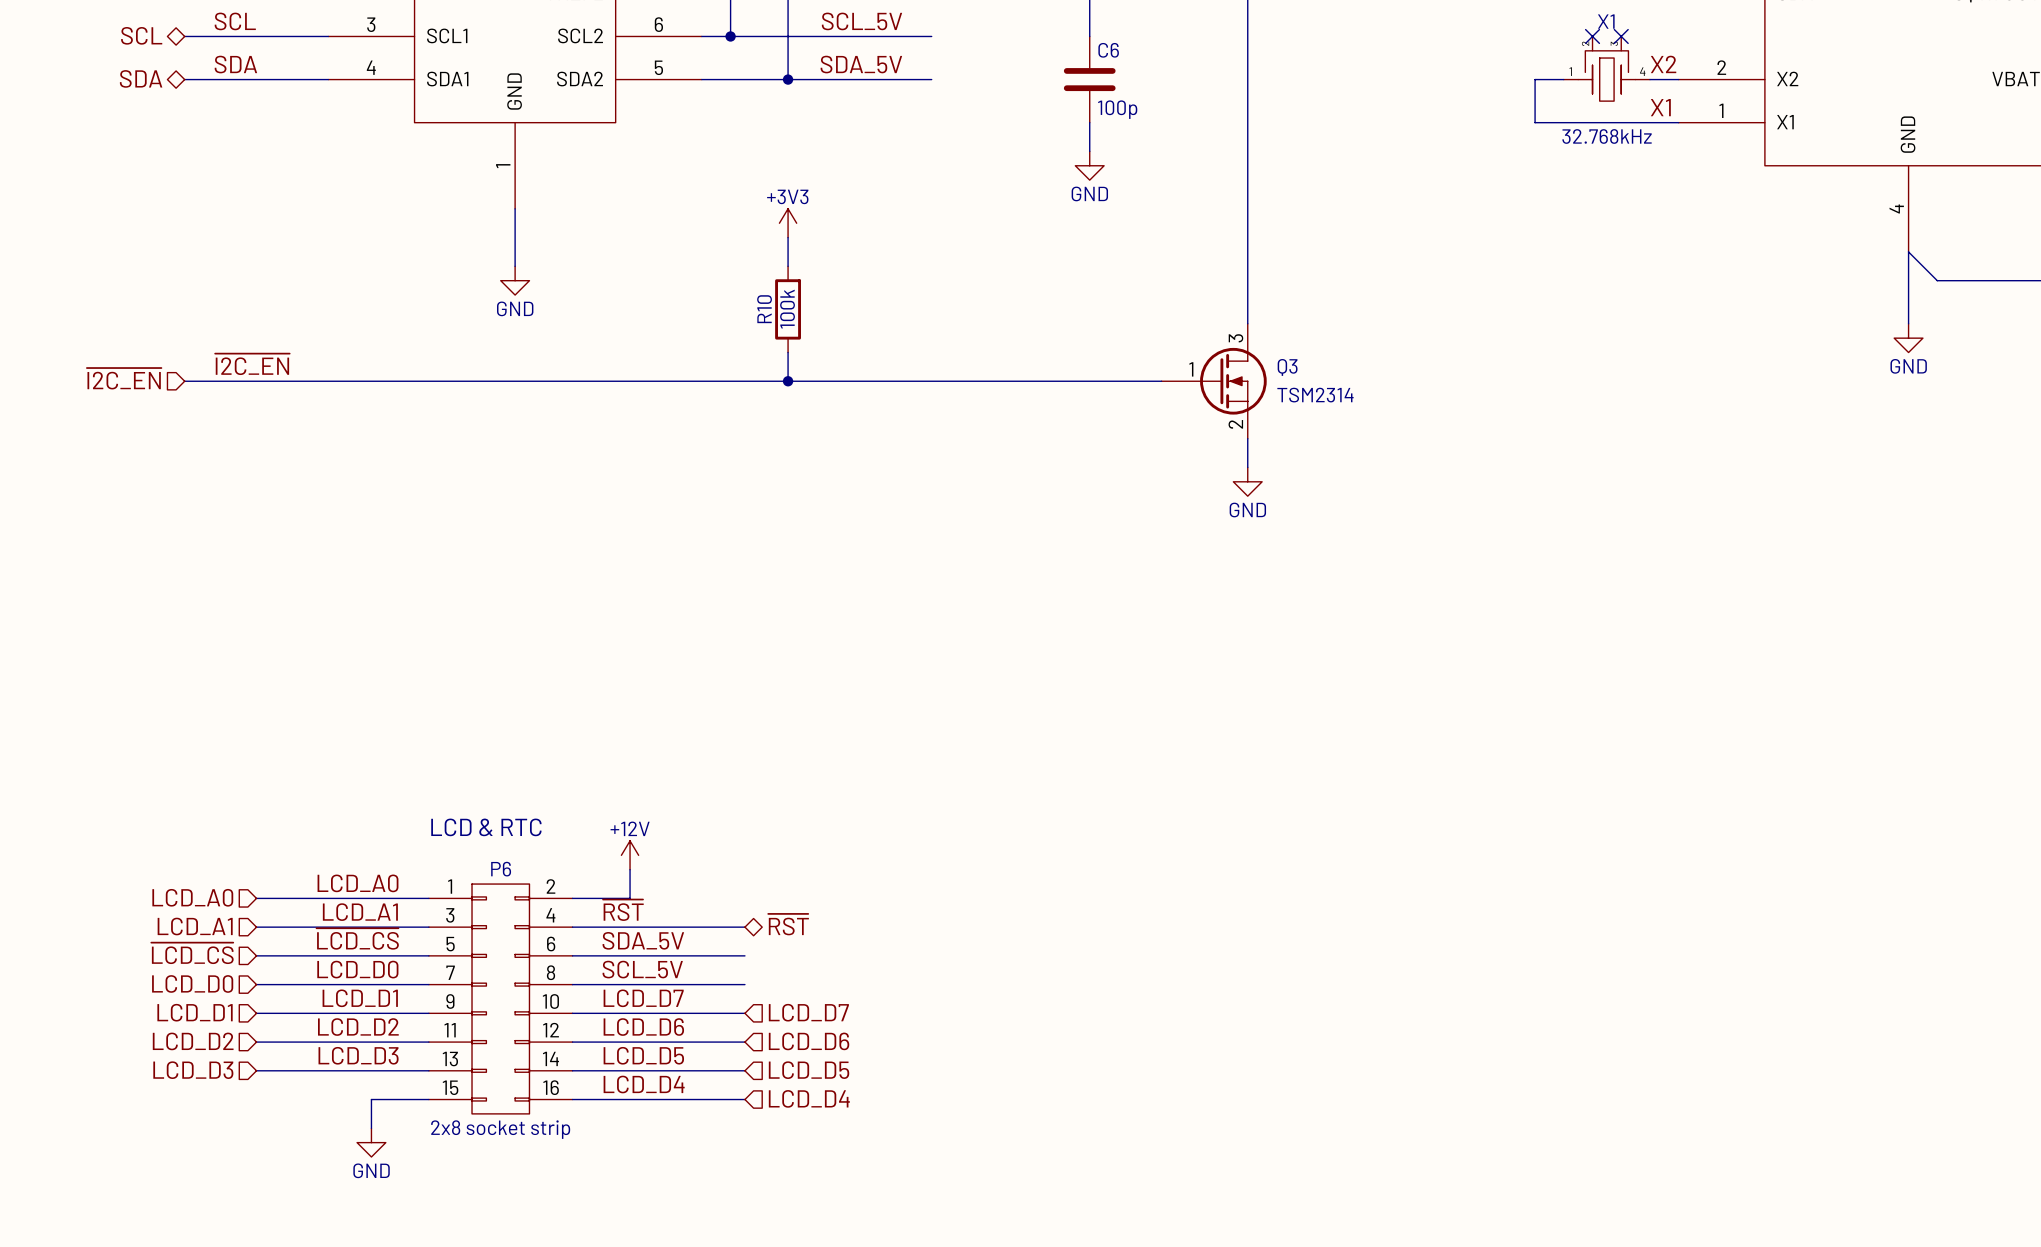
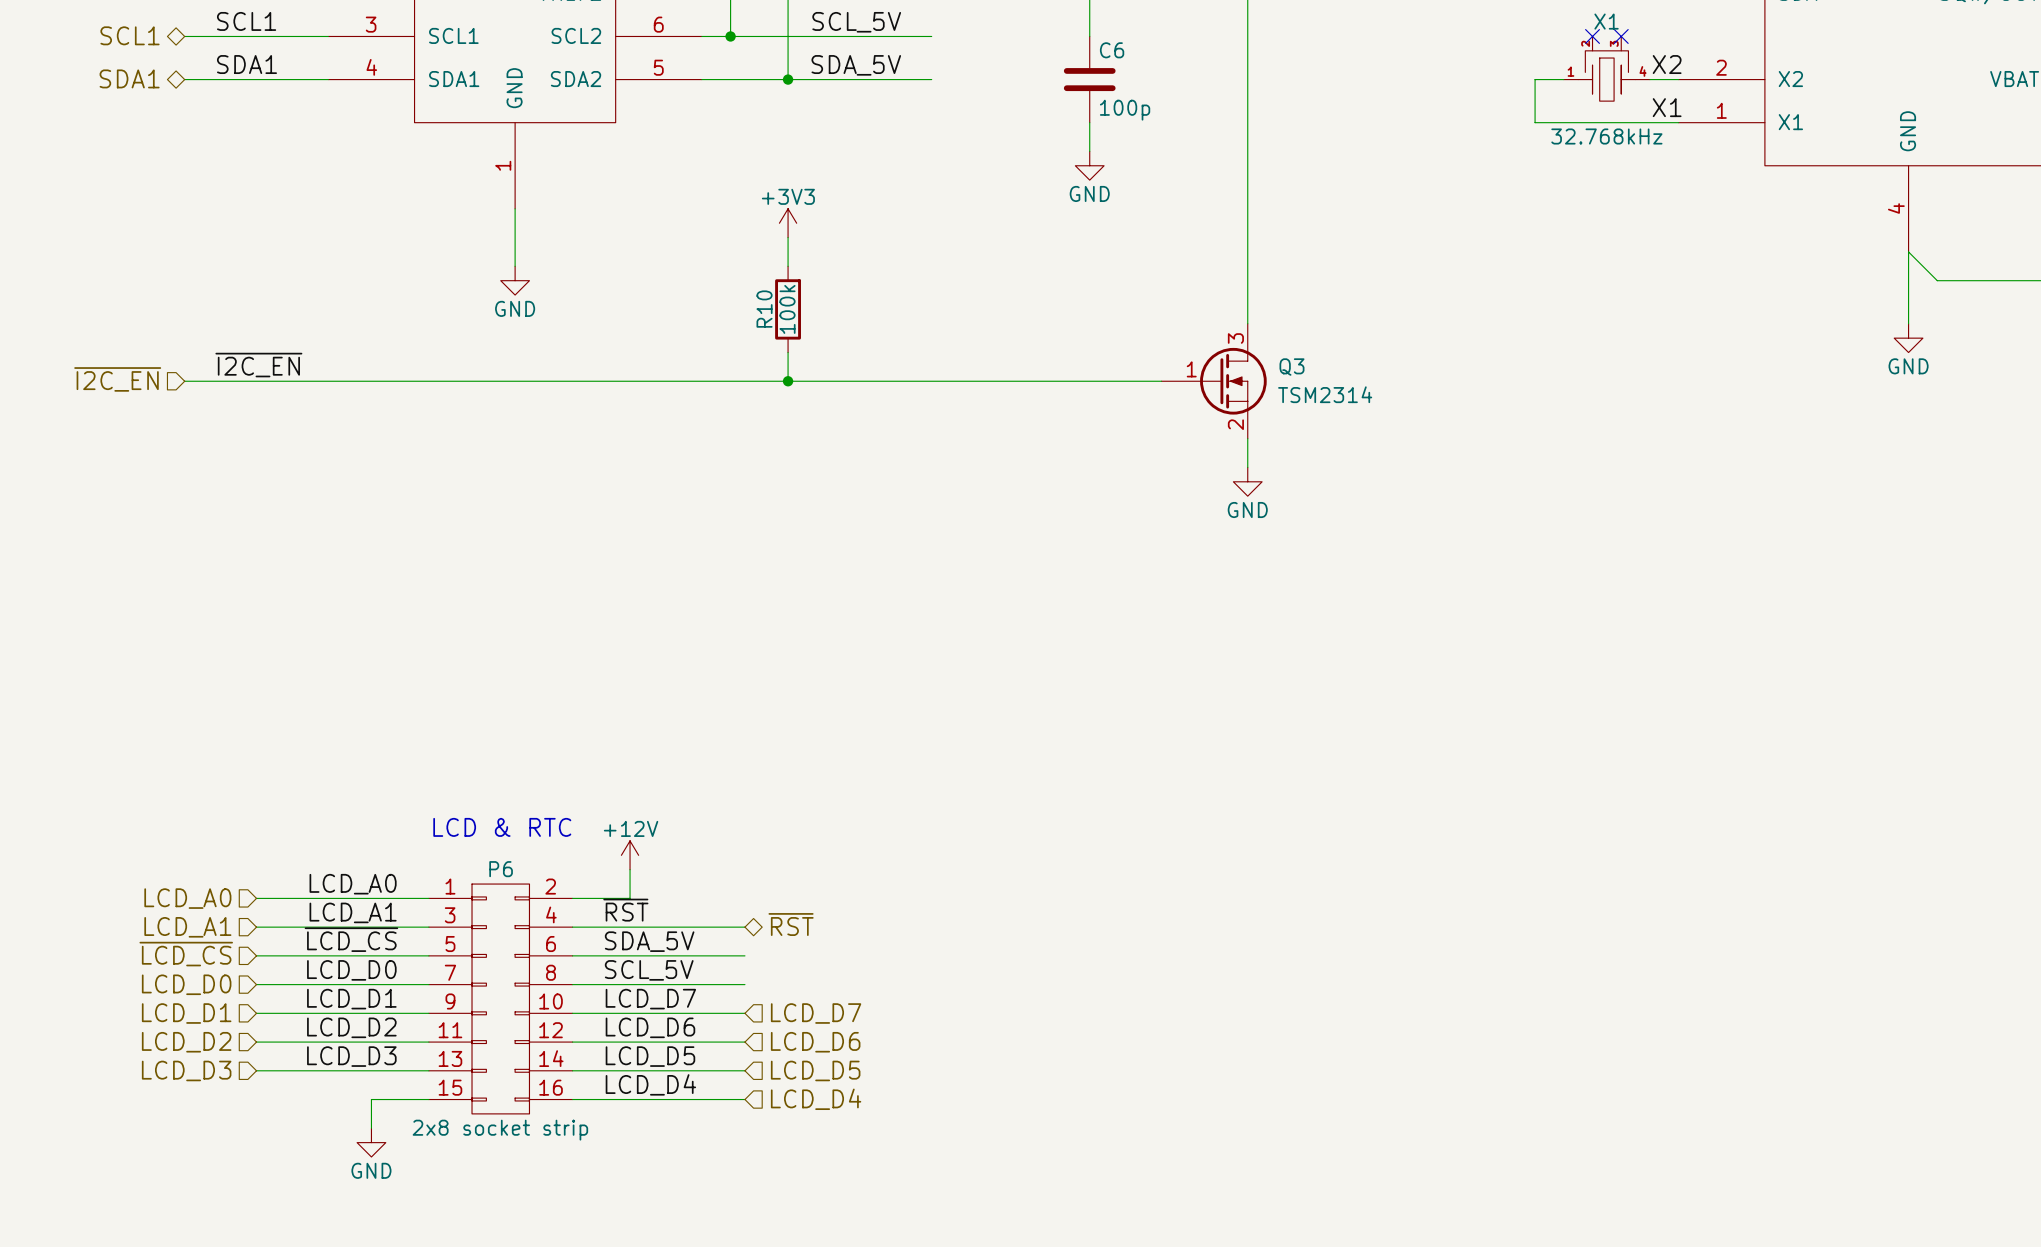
label: SCL (235, 21) -> SCL1 (246, 21)
hierarchical label: SCL (141, 35) -> SCL1 (130, 35)
label: SDA (235, 64) -> SDA1 (246, 64)
hierarchical label: SDA (141, 78) -> SDA1 (129, 78)

